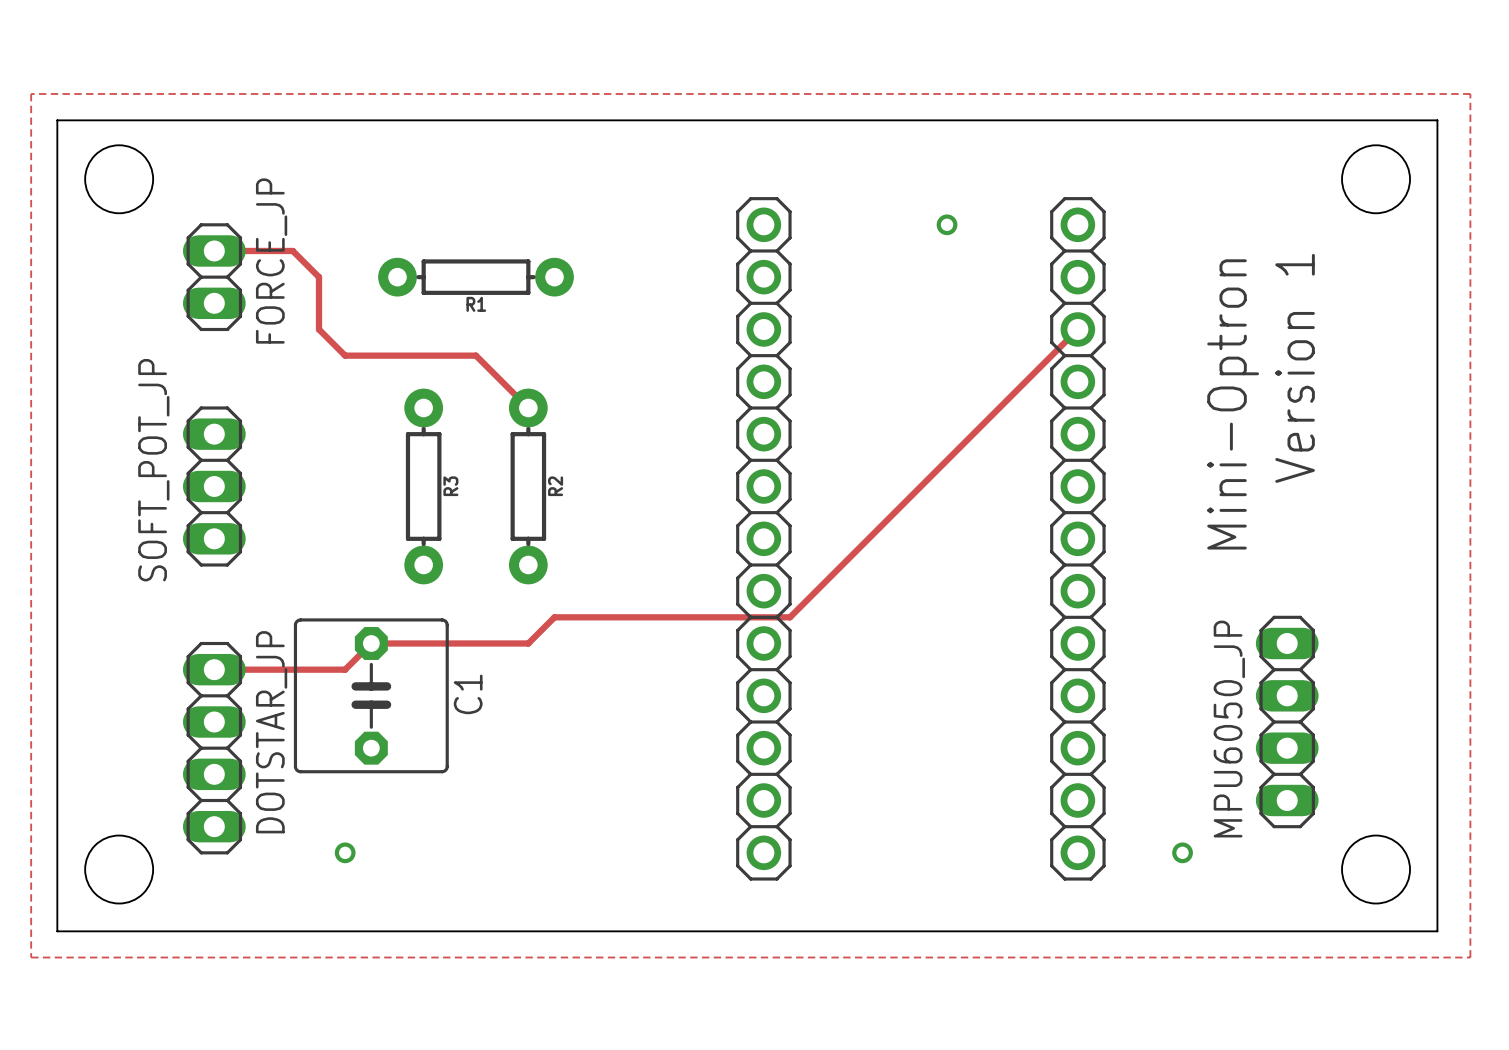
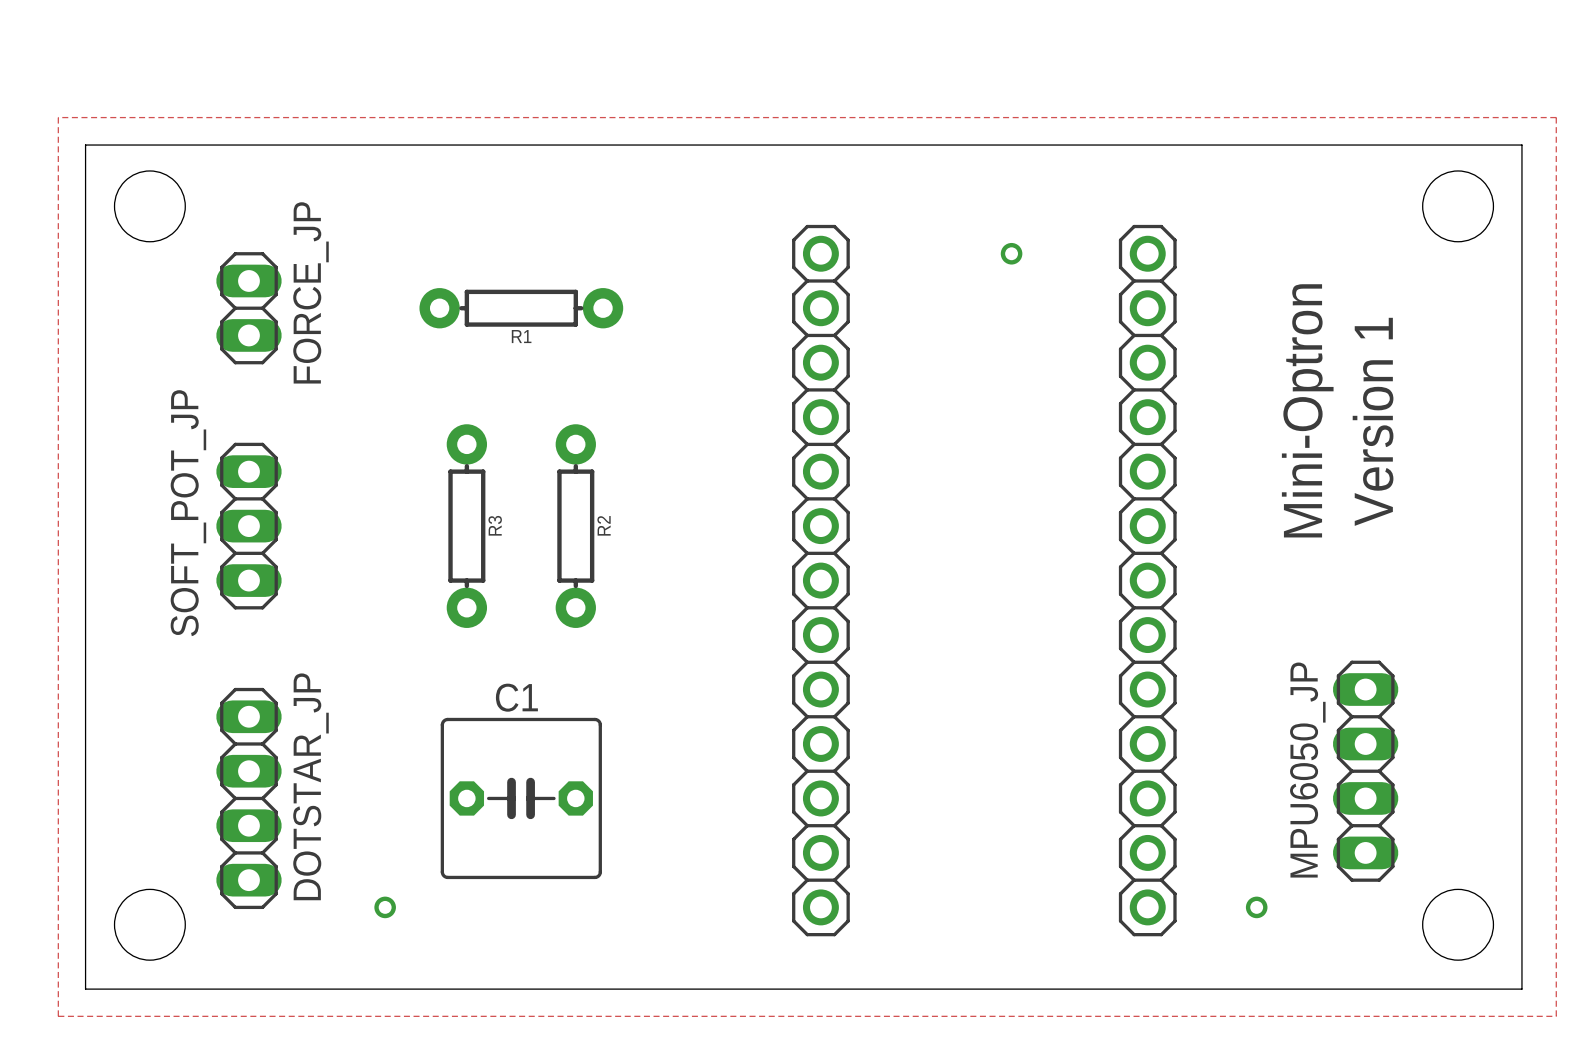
track: (214, 250) (292, 250) (319, 277) (319, 329) (345, 355) (476, 355) (528, 407) -> none
track: (1077, 329) (790, 617) (554, 617) (528, 643) (371, 643) (345, 669) (214, 669) -> none
C1 rotation: 0° (371, 695) -> 90° counterclockwise (521, 798)
C1 position: (371, 695) -> (521, 798)

